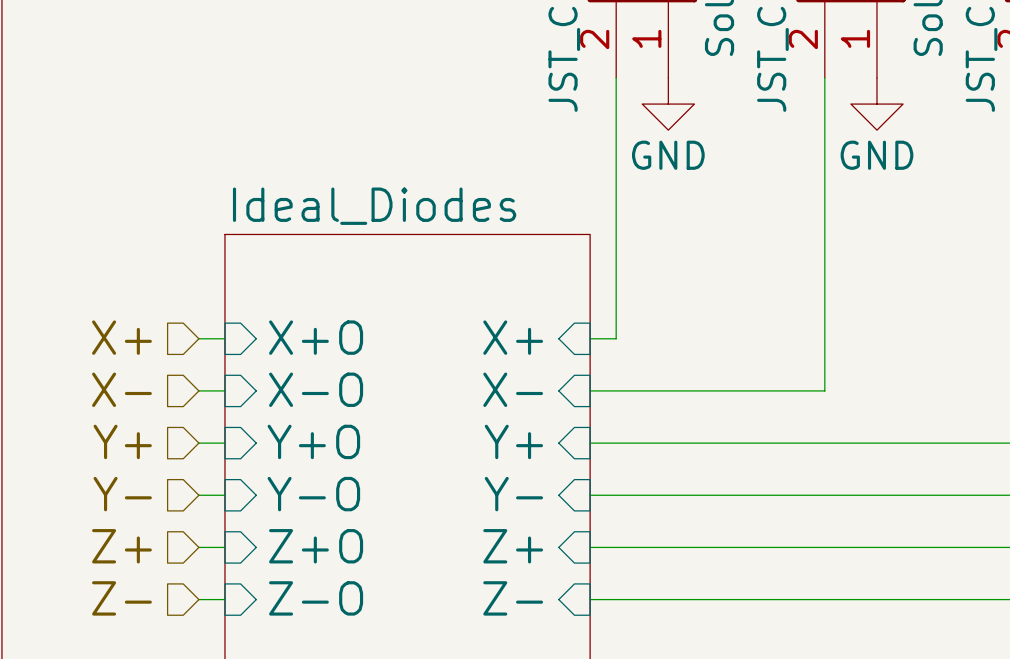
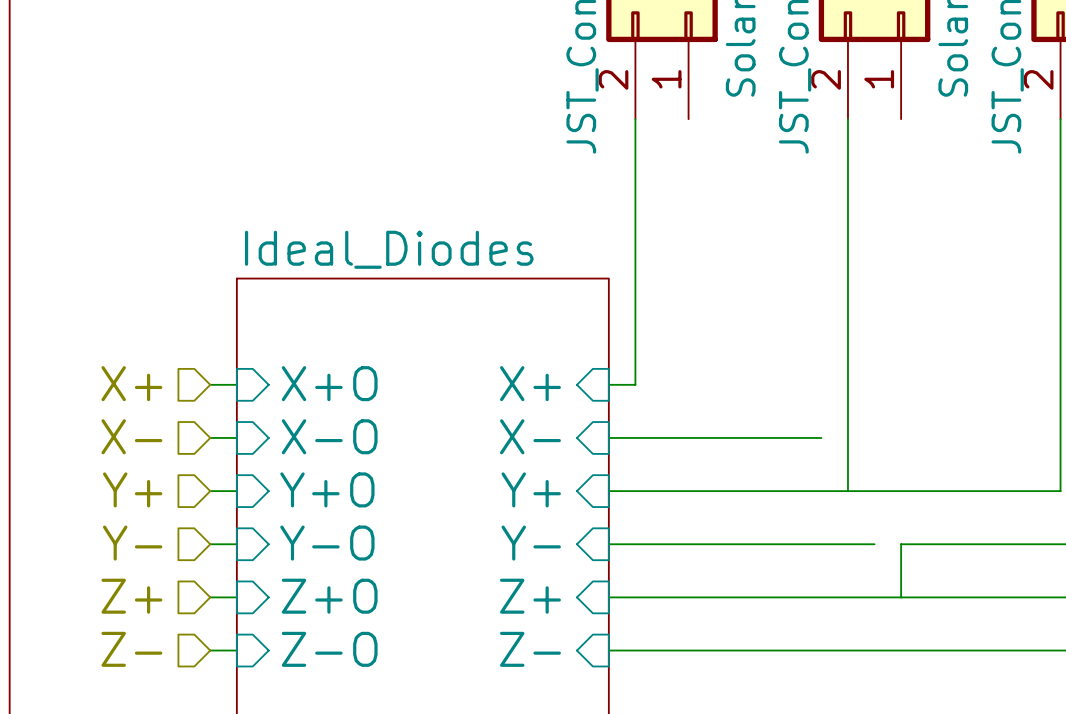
power symbol: GND (668, 104) -> none
power symbol: GND (876, 104) -> none
wire: (798, 390) (824, 390) -> (847, 491) (847, 437)
wire: (850, 495) (876, 495) -> (901, 597) (901, 544)

